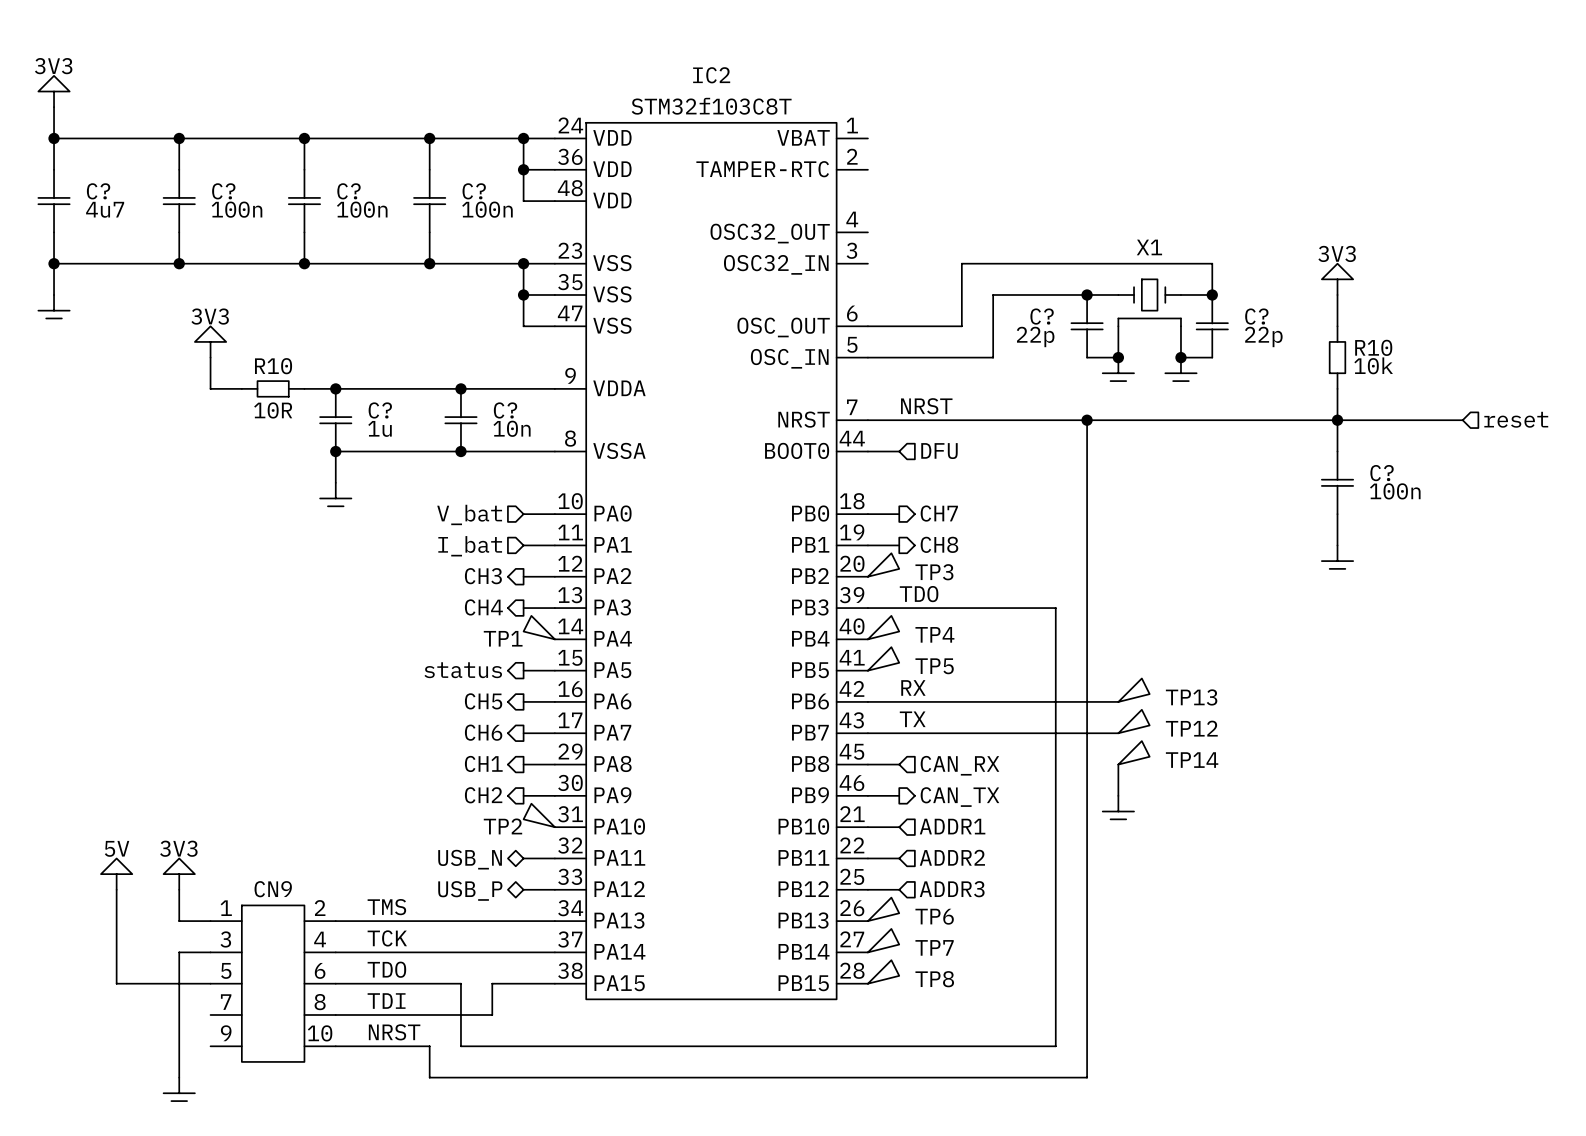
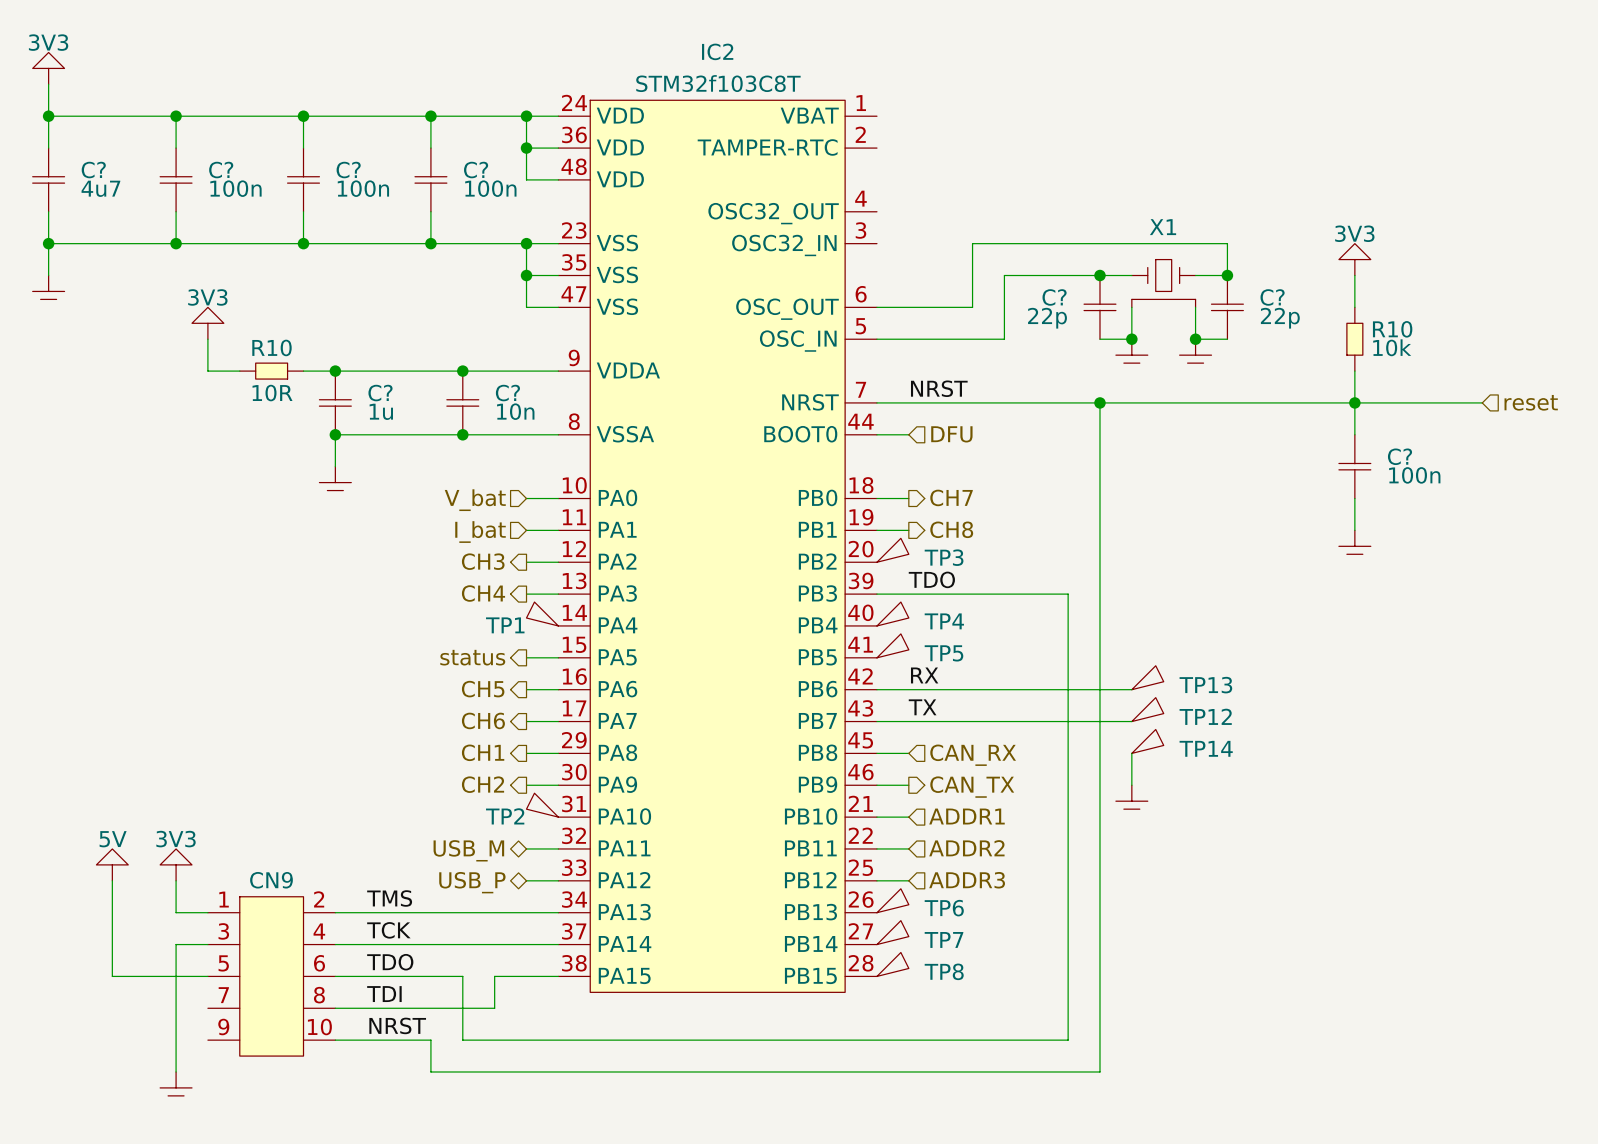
hierarchical label: USB_N (470, 859) -> USB_M (468, 850)

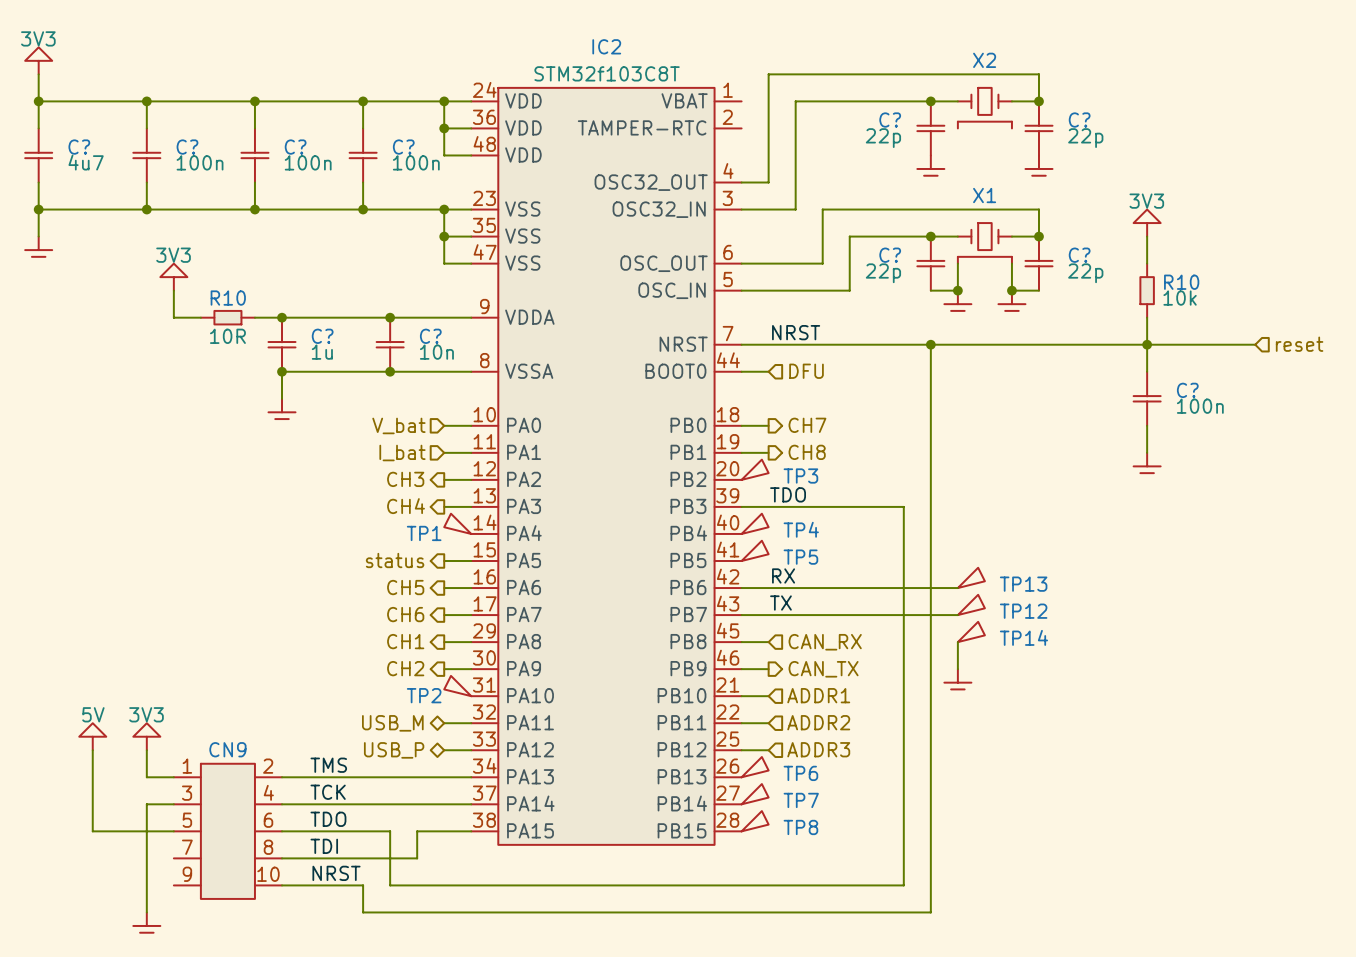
junction: none -> (930, 101)
wire: none -> (957, 101) (795, 101) (795, 209) (741, 209)
wire: none -> (1011, 101) (1038, 101) (1038, 74) (768, 74) (768, 182) (741, 182)
junction: none -> (1038, 101)
X2: none -> (984, 108)
C?: none -> 22p (930, 128)
C?: none -> 22p (1038, 128)
power symbol: none -> (930, 168)
power symbol: none -> (1038, 168)

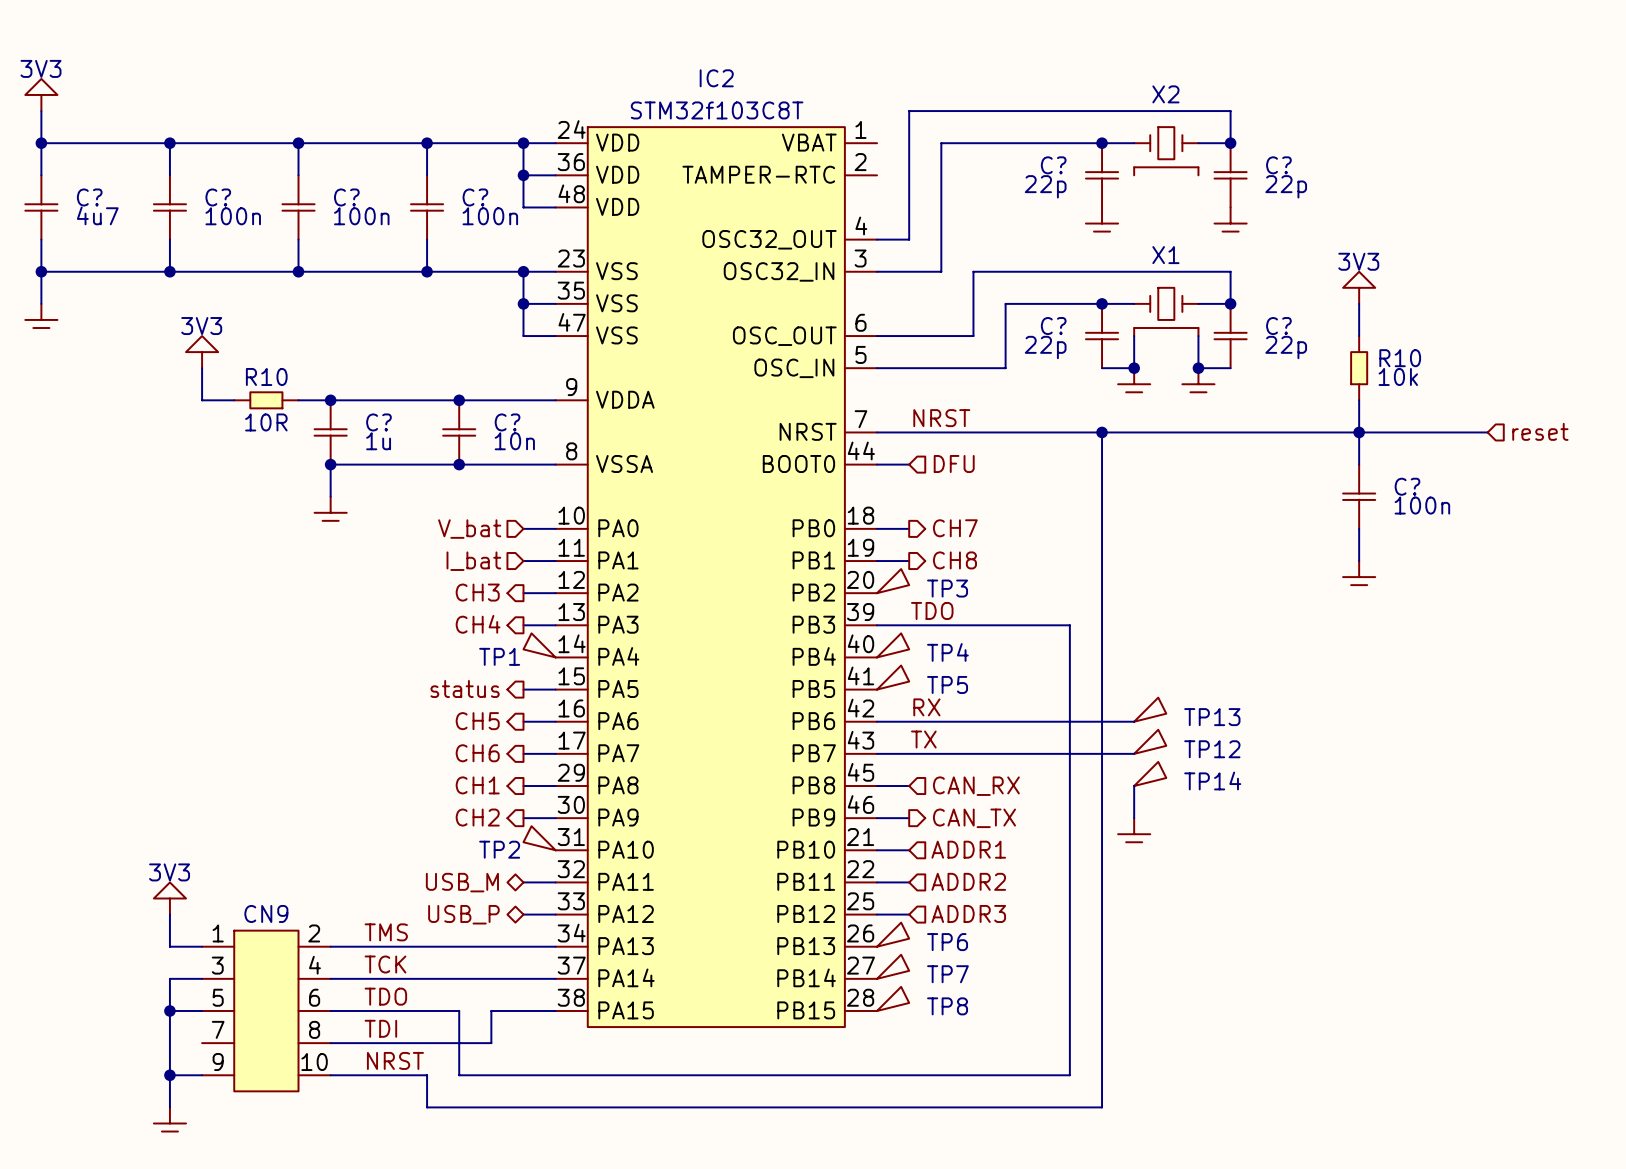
power symbol: 5V (92, 736) -> none
wire: (92, 750) (92, 831) (146, 831) -> none
junction: none -> (169, 1010)
wire: none -> (169, 1075) (202, 1075)
junction: none -> (169, 1075)

